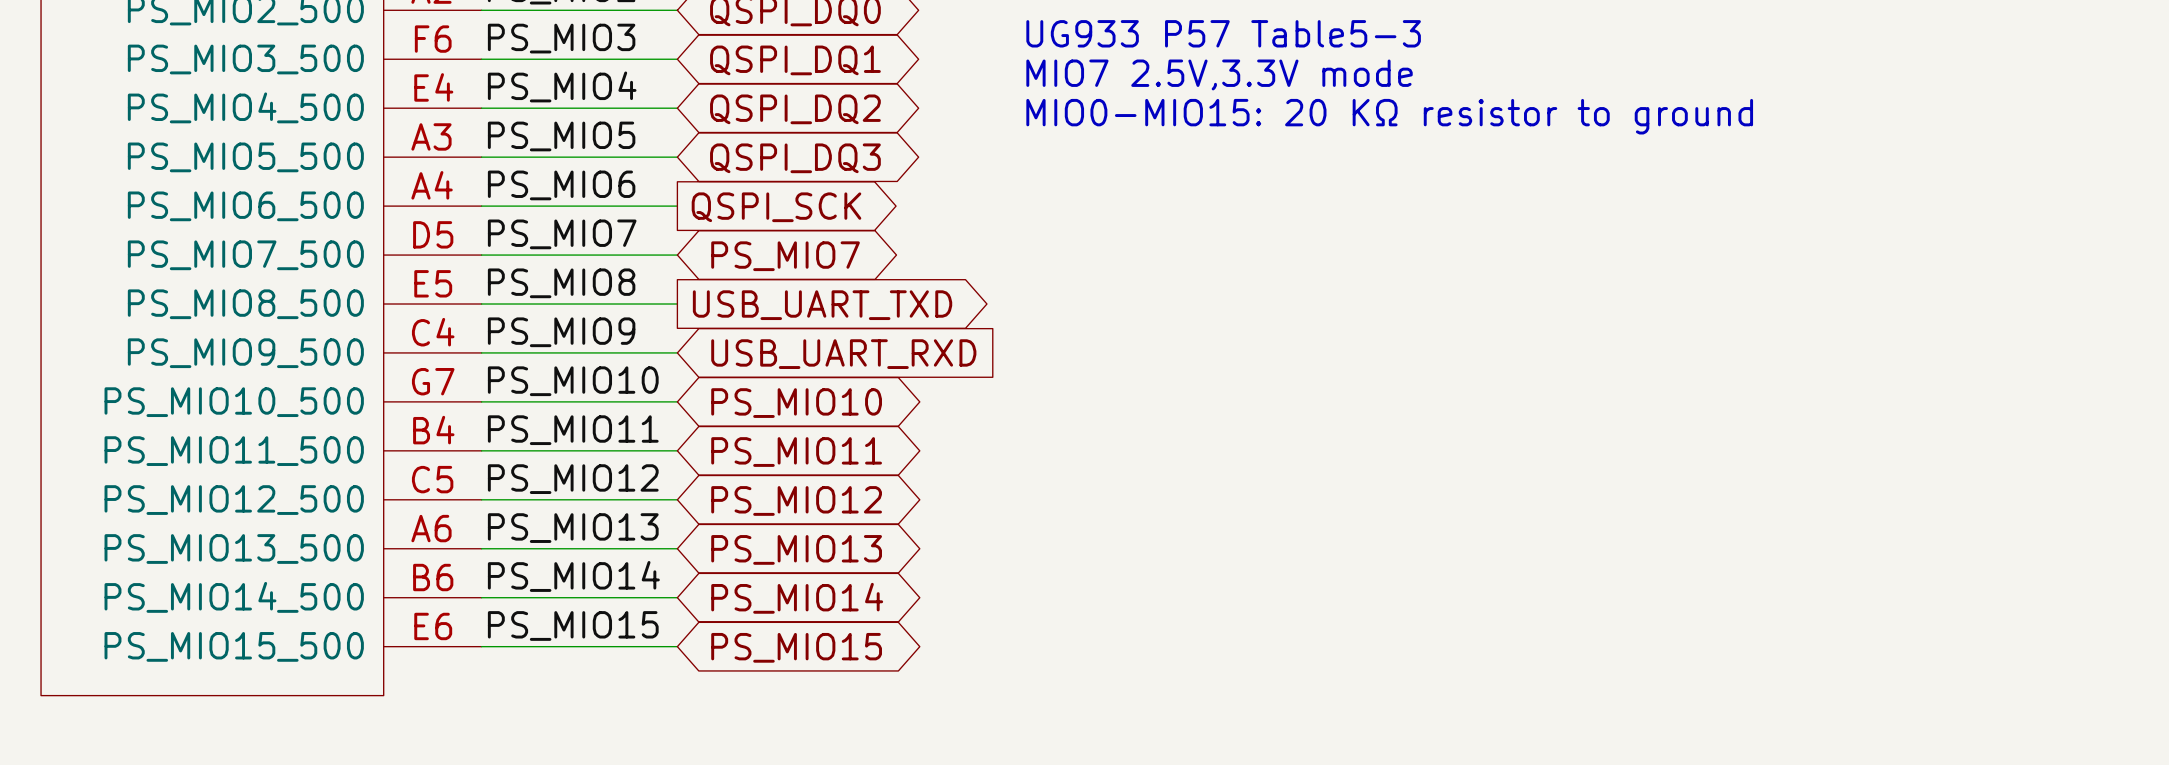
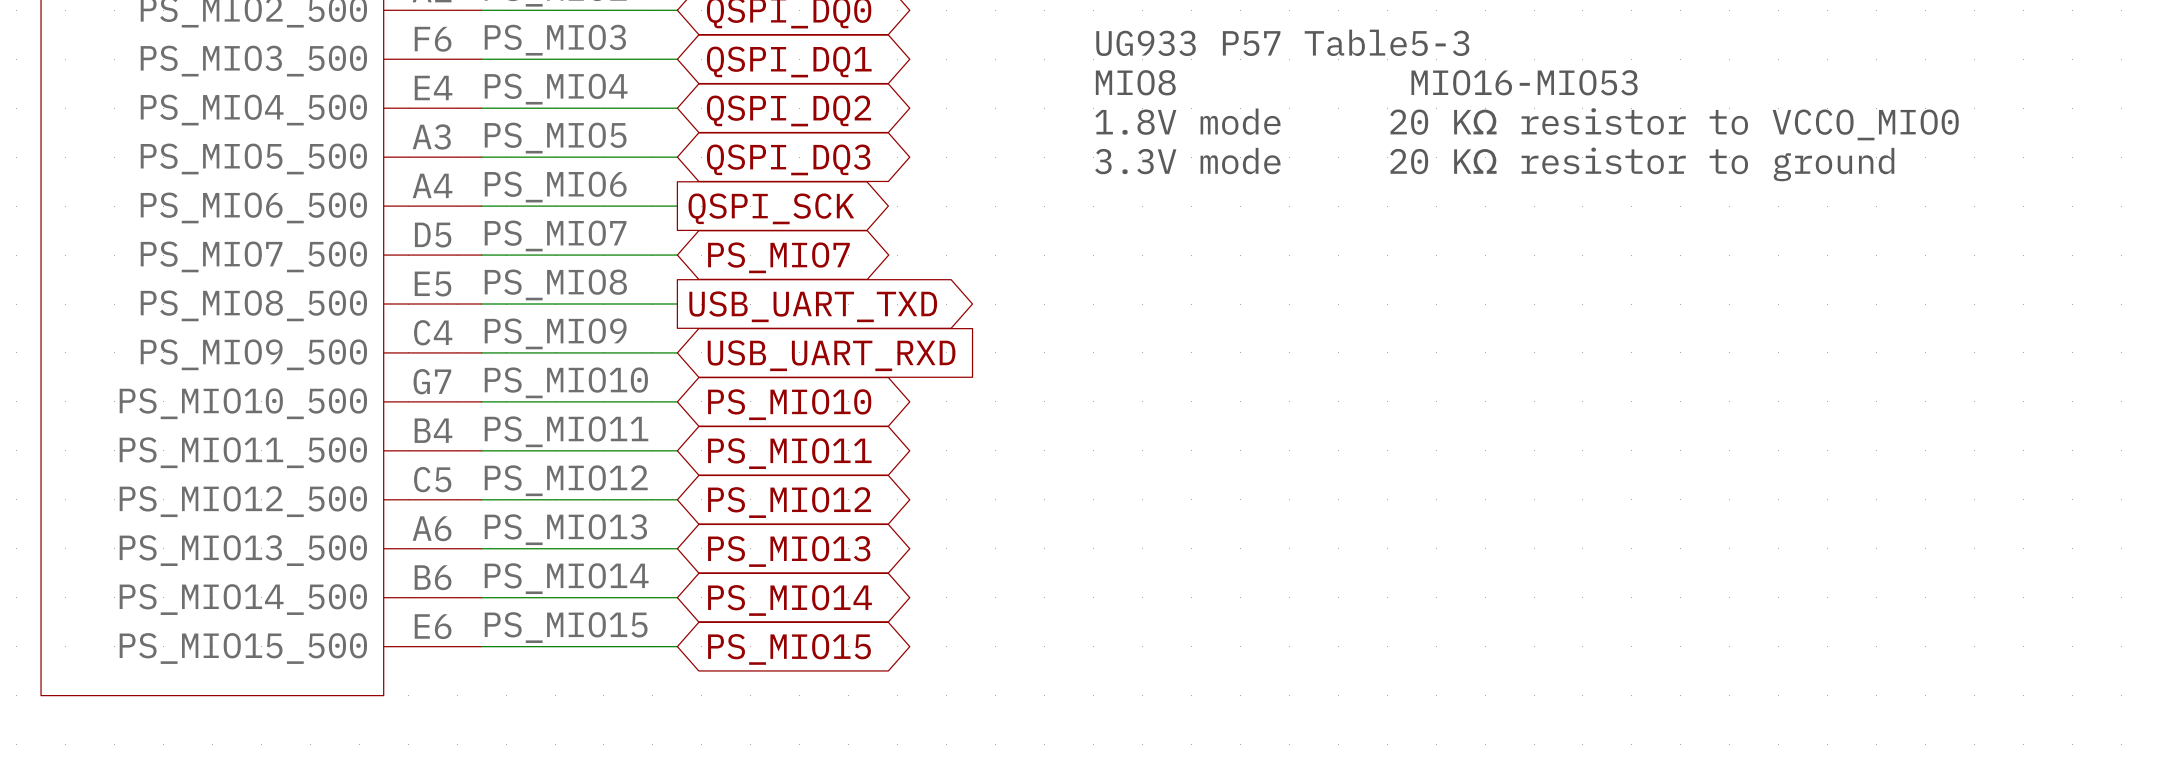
text position: UG933 P57 Table5-3 (1223, 33) -> UG933 P57 Table5-3 (1282, 42)
text: MIO7 2.5V,3.3V mode (1219, 74) -> none
text: none -> MIO8 MIO16-MIO53 (1366, 82)
text: MIO0-MIO15: 20 KΩ resistor to ground (1389, 116) -> 3.3V mode 20 KΩ resistor to ground (1494, 164)
text: none -> 1.8V mode 20 KΩ resistor to VCCO_MIO0 (1527, 124)

